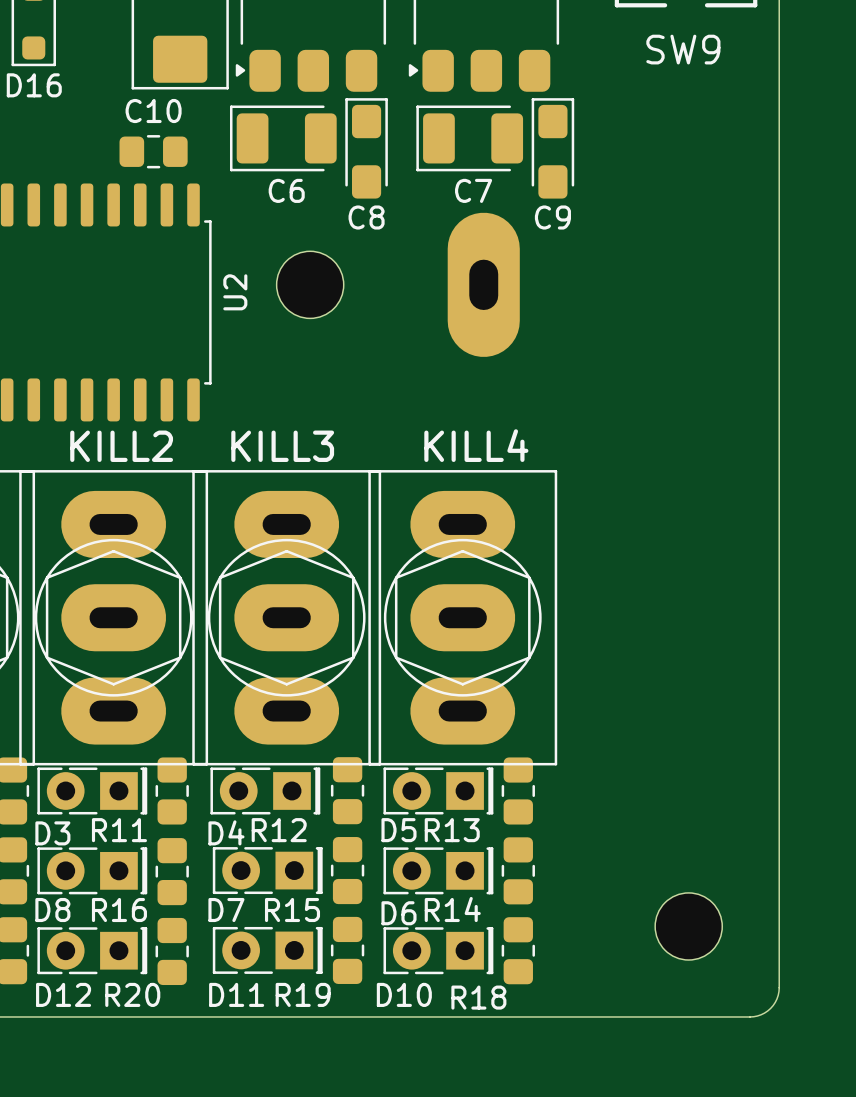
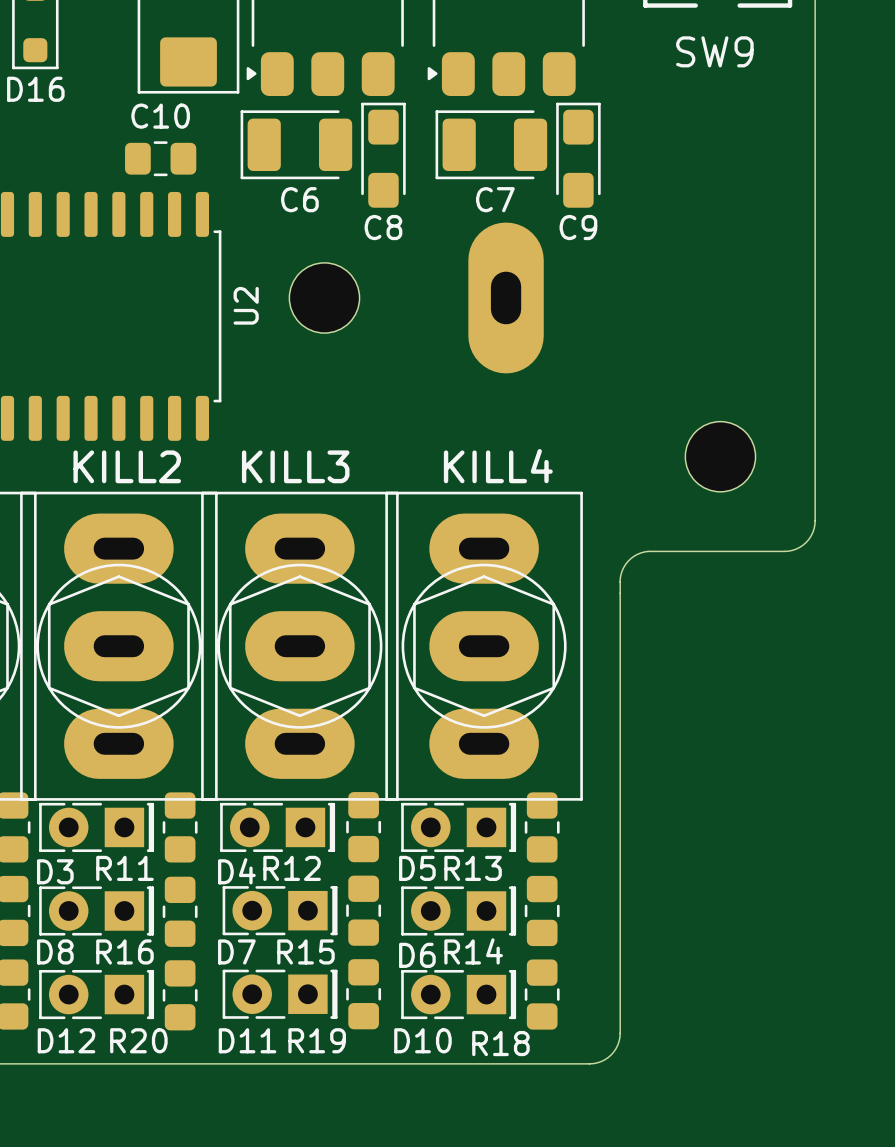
board edge: (779, 497) (779, 987) (777, 998) (767, 1010) (753, 1016) (563, 1016) -> (620, 582) (620, 1033) (617, 1044) (611, 1054) (601, 1061) (589, 1063)
board edge: none -> (815, 520) (812, 532) (806, 542) (799, 547) (788, 551) (648, 551) (640, 553) (625, 564) (620, 582)
part position: (688, 926) -> (720, 456)

